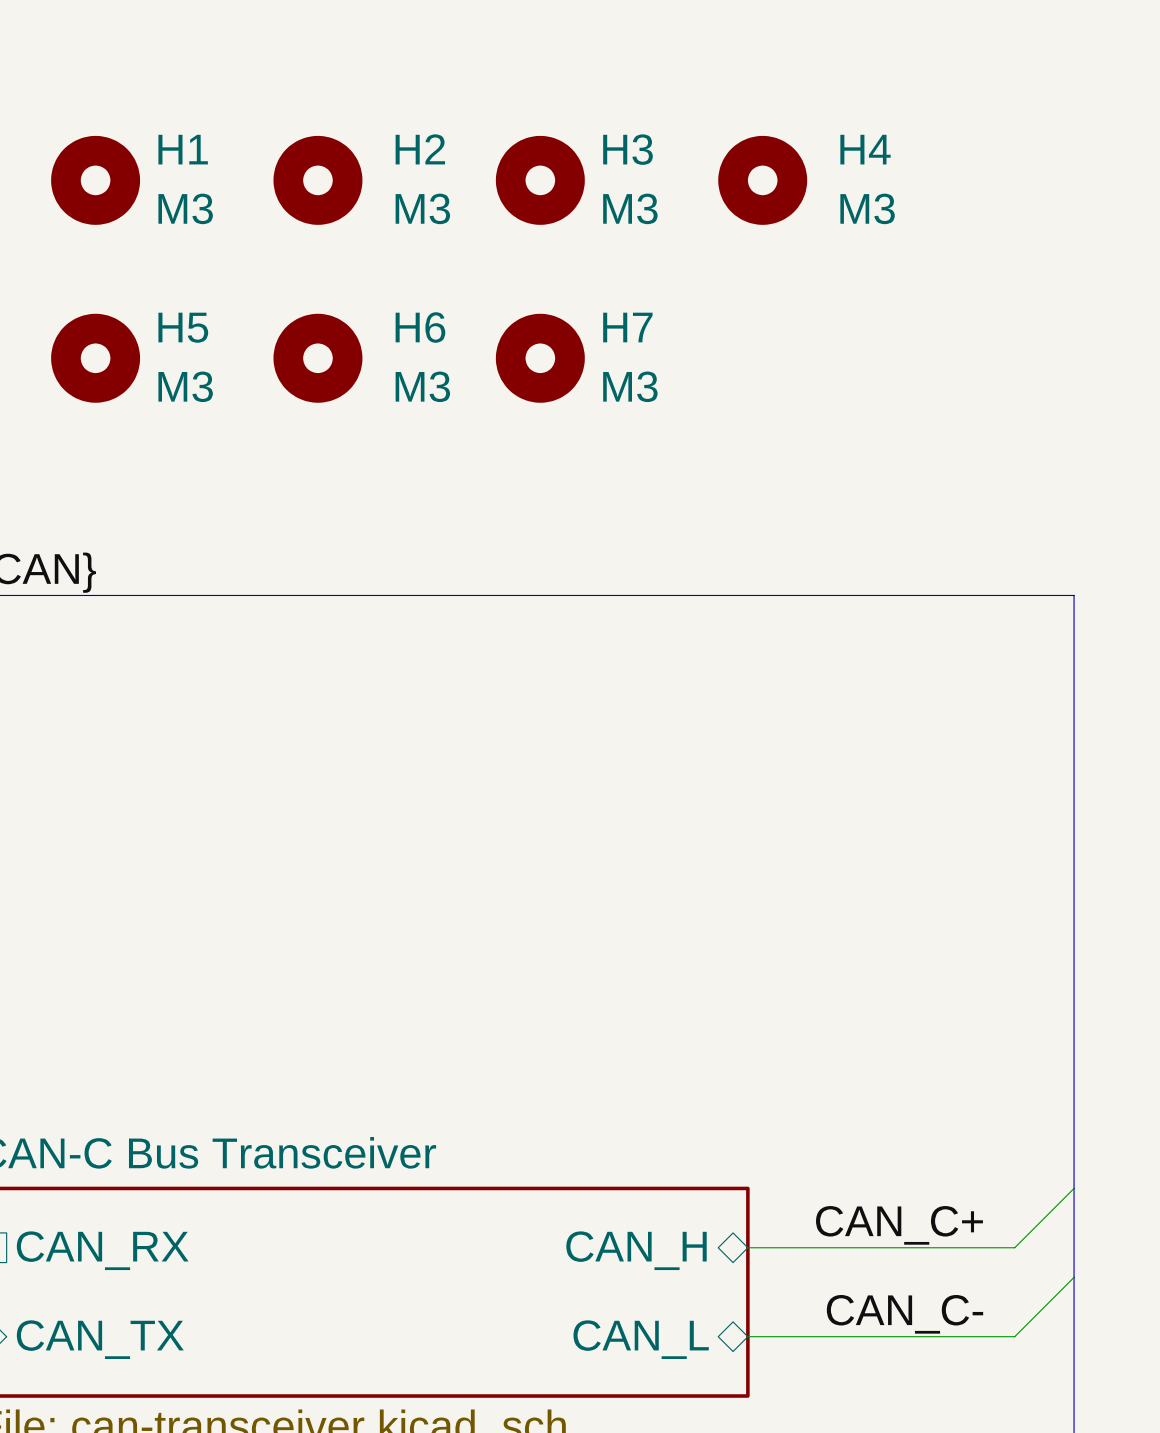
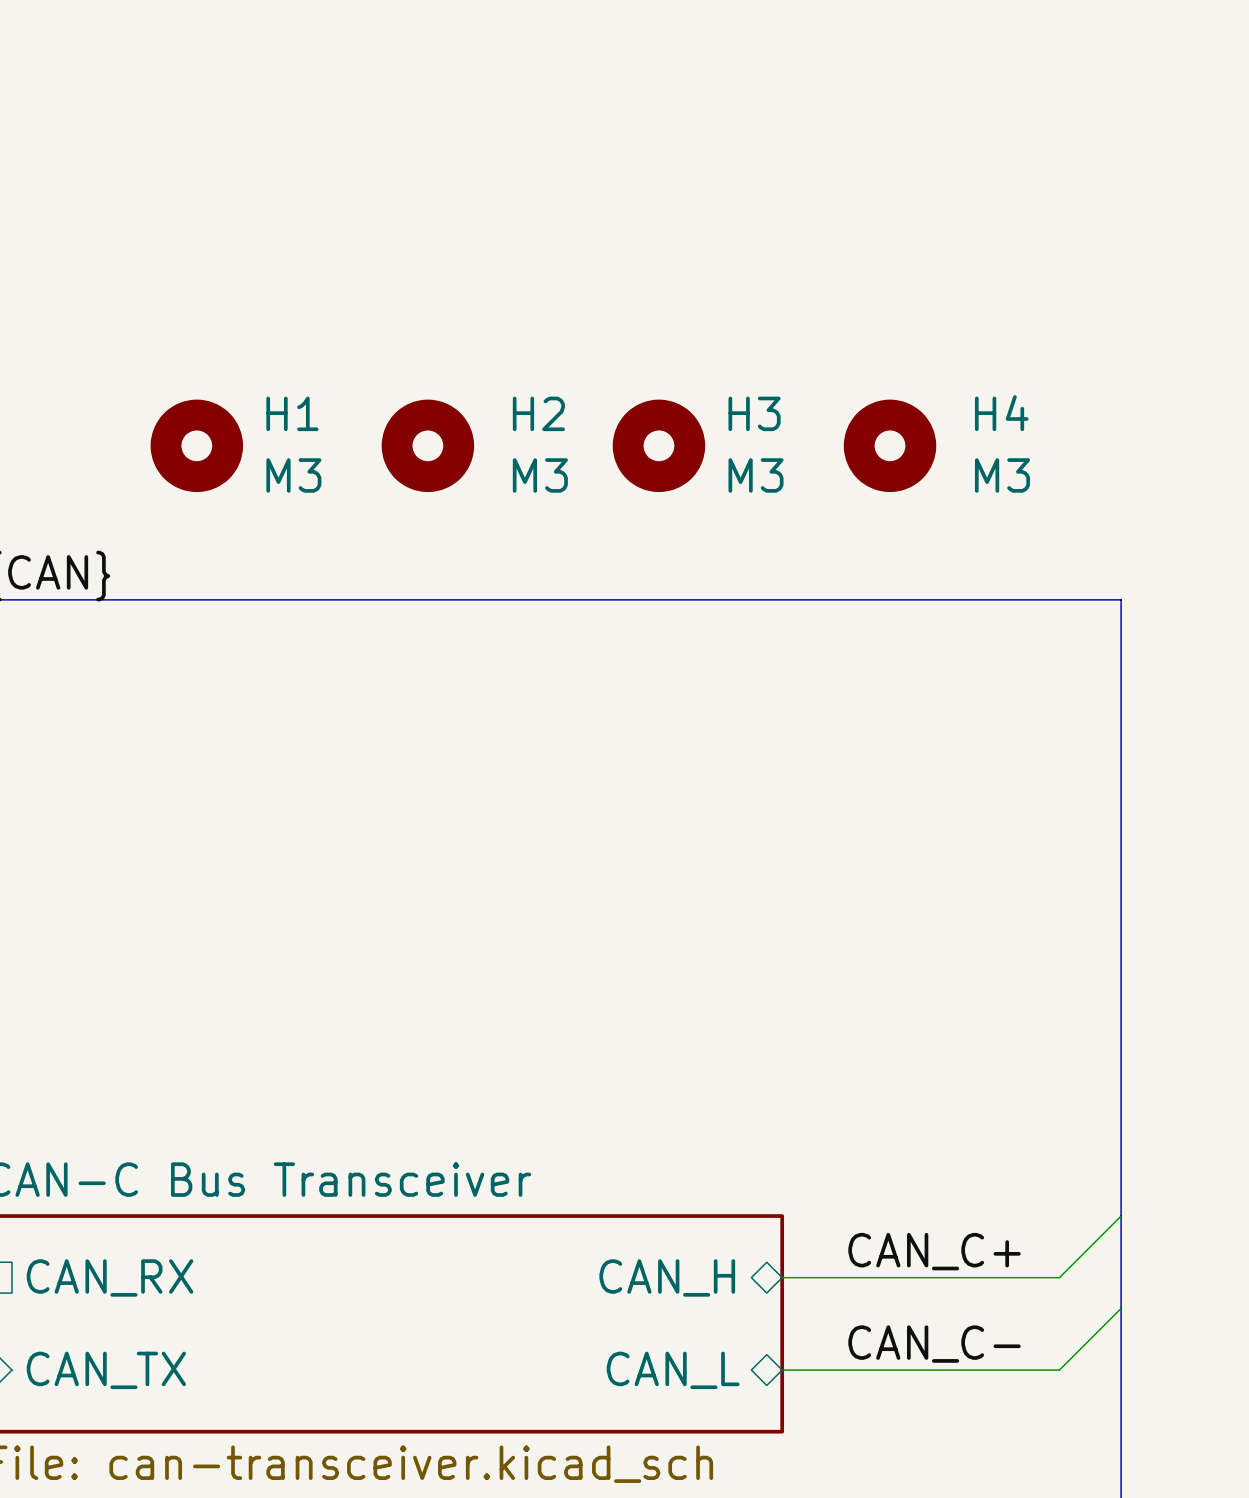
H1 position: (95, 180) -> (196, 445)
H2 position: (317, 180) -> (427, 445)
H3 position: (540, 180) -> (658, 445)
H4 position: (762, 180) -> (890, 445)
H5: M3 (95, 358) -> none
H6: M3 (317, 358) -> none
H7: M3 (540, 358) -> none

